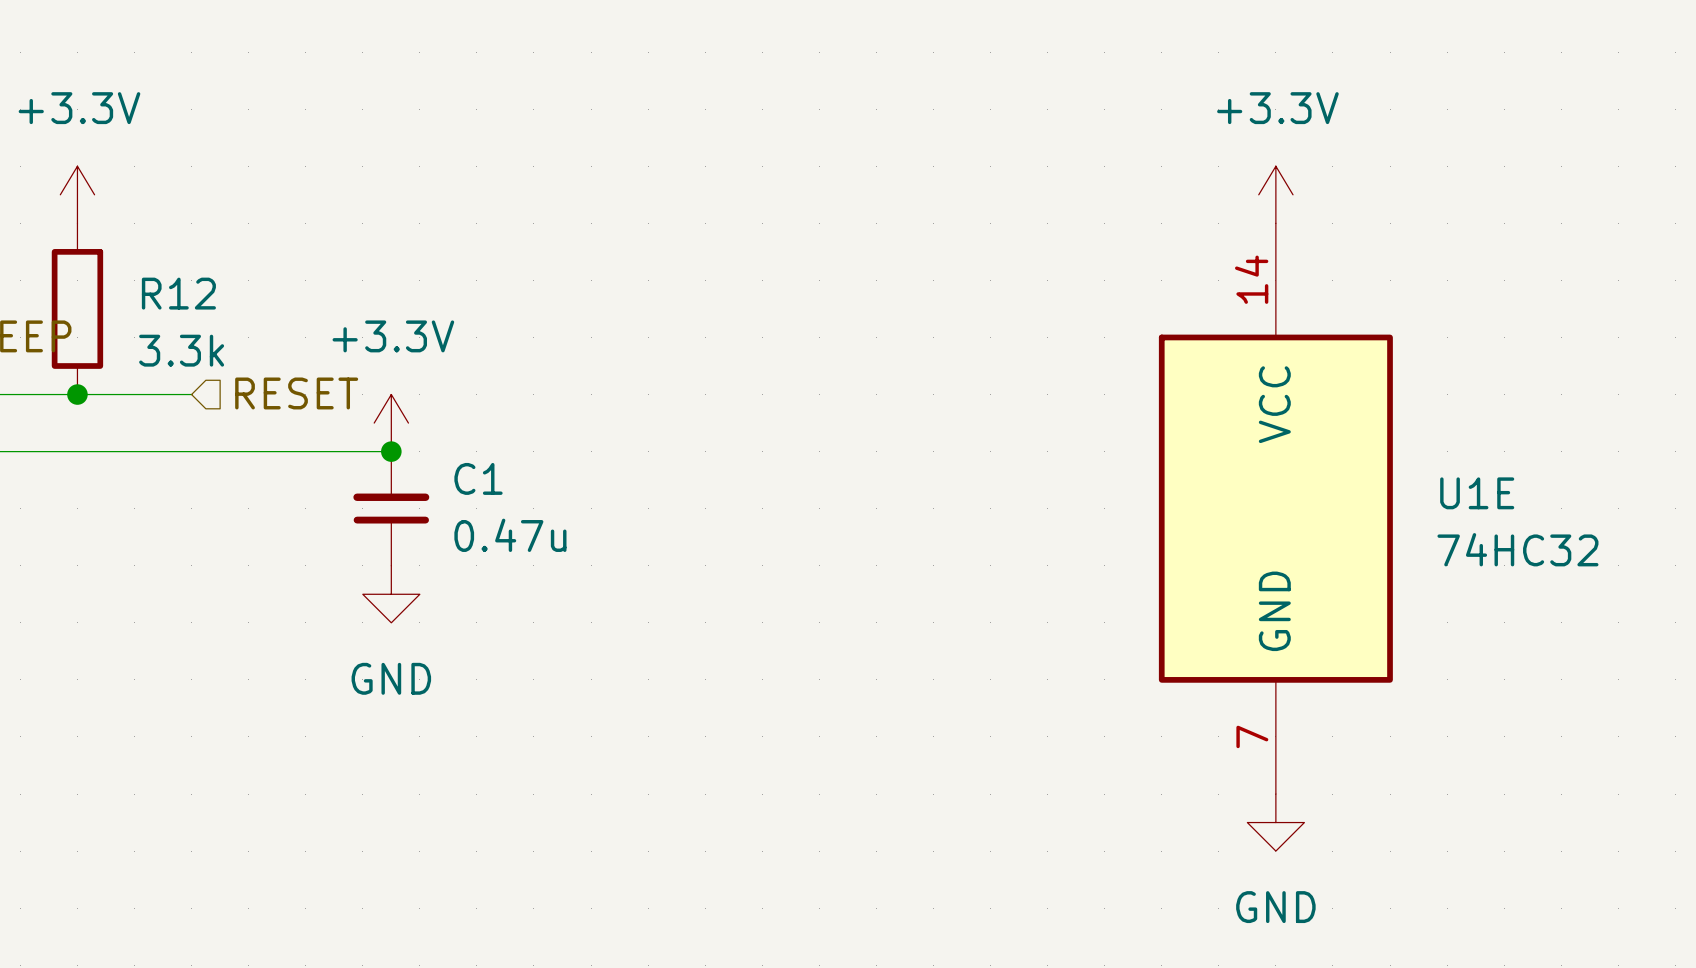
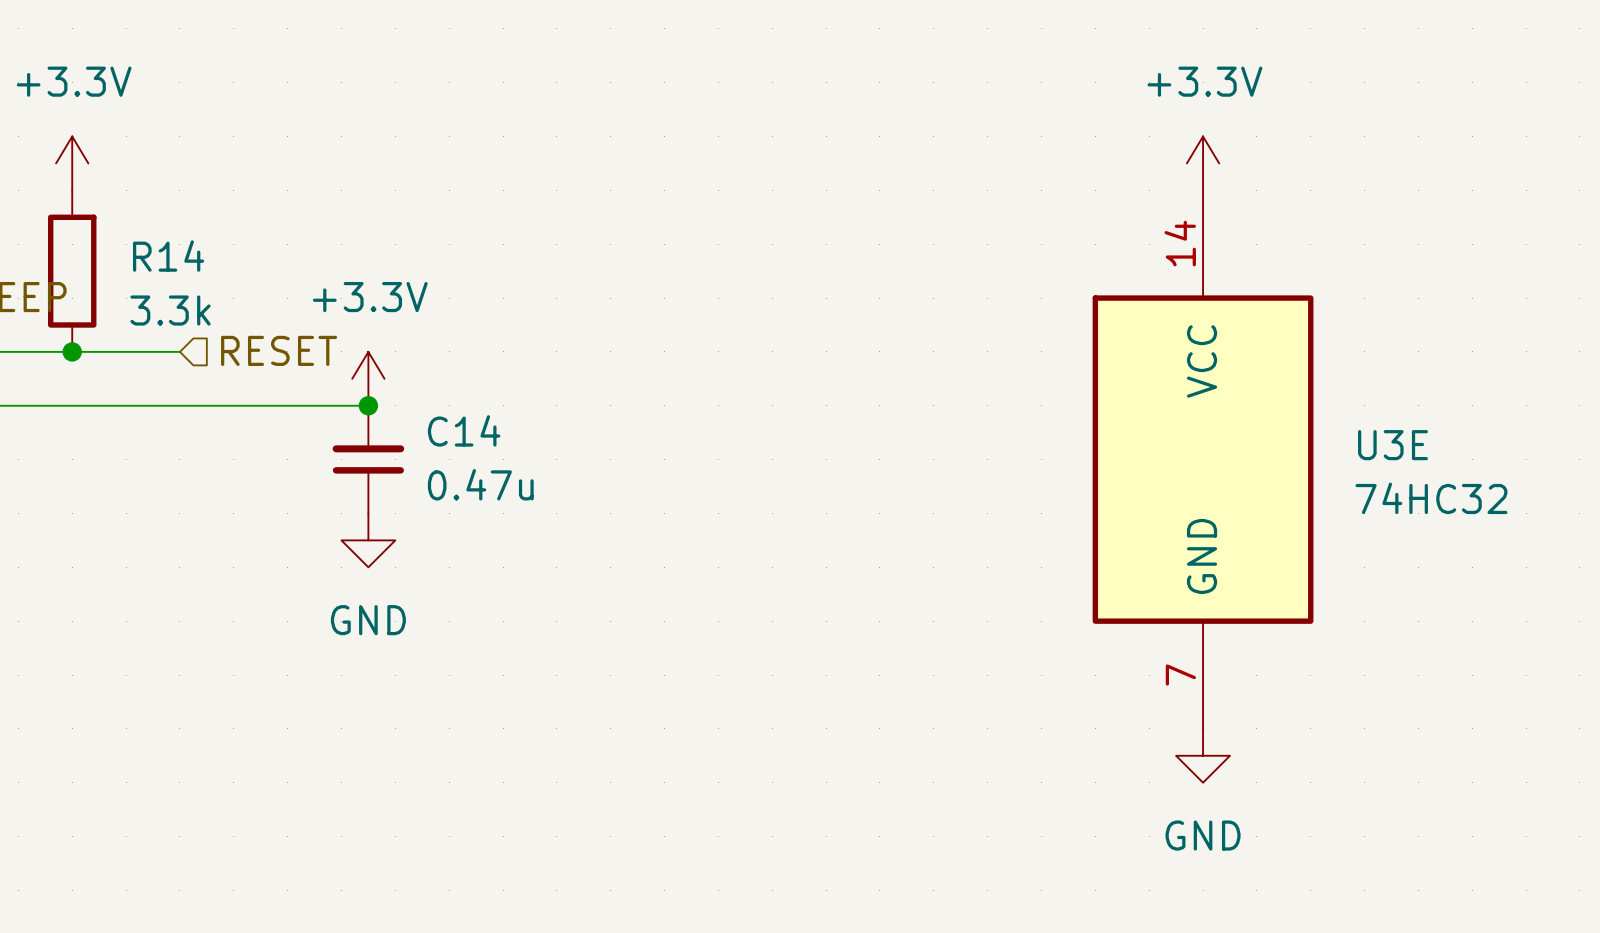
R12 name: R12 (178, 293) -> R14 (168, 256)
C1 name: C1 (478, 478) -> C14 (464, 430)
U1E name: U1E (1477, 493) -> U3E (1393, 445)

